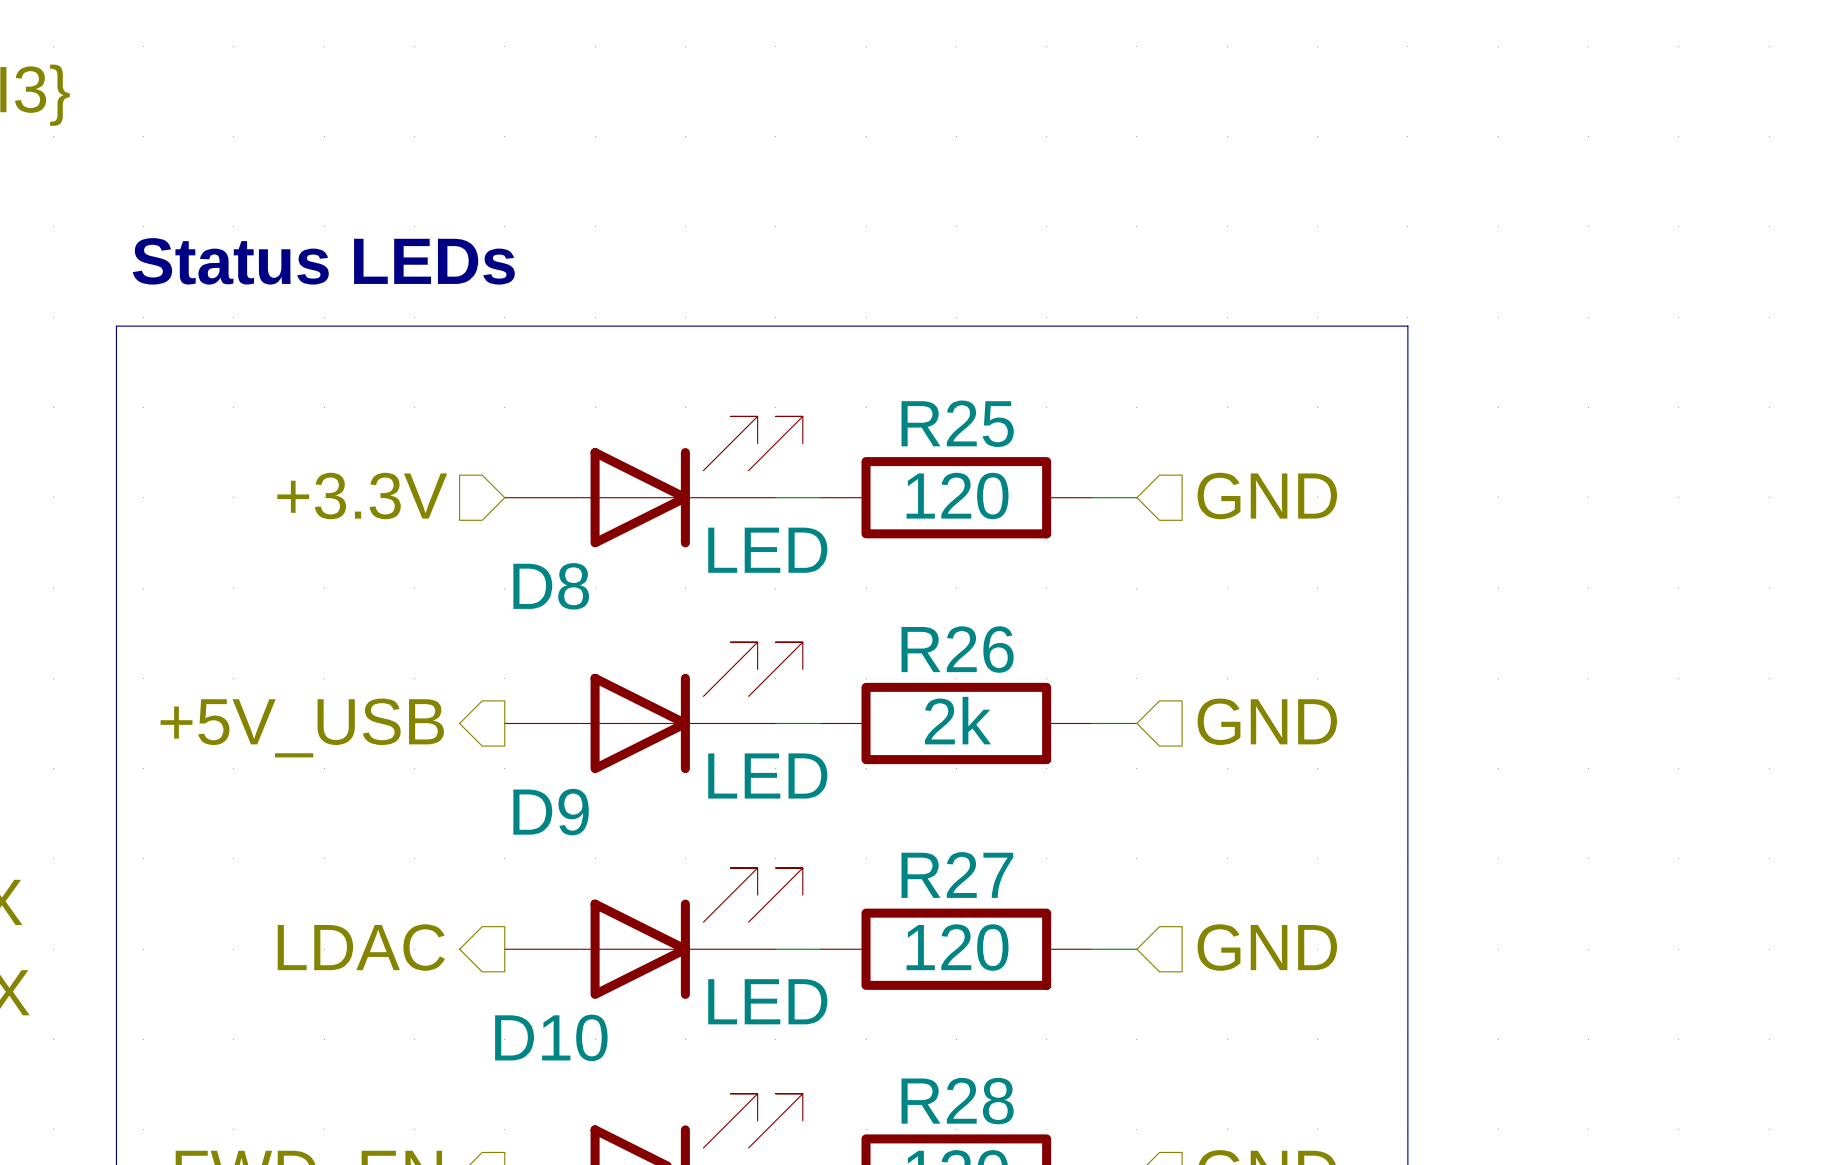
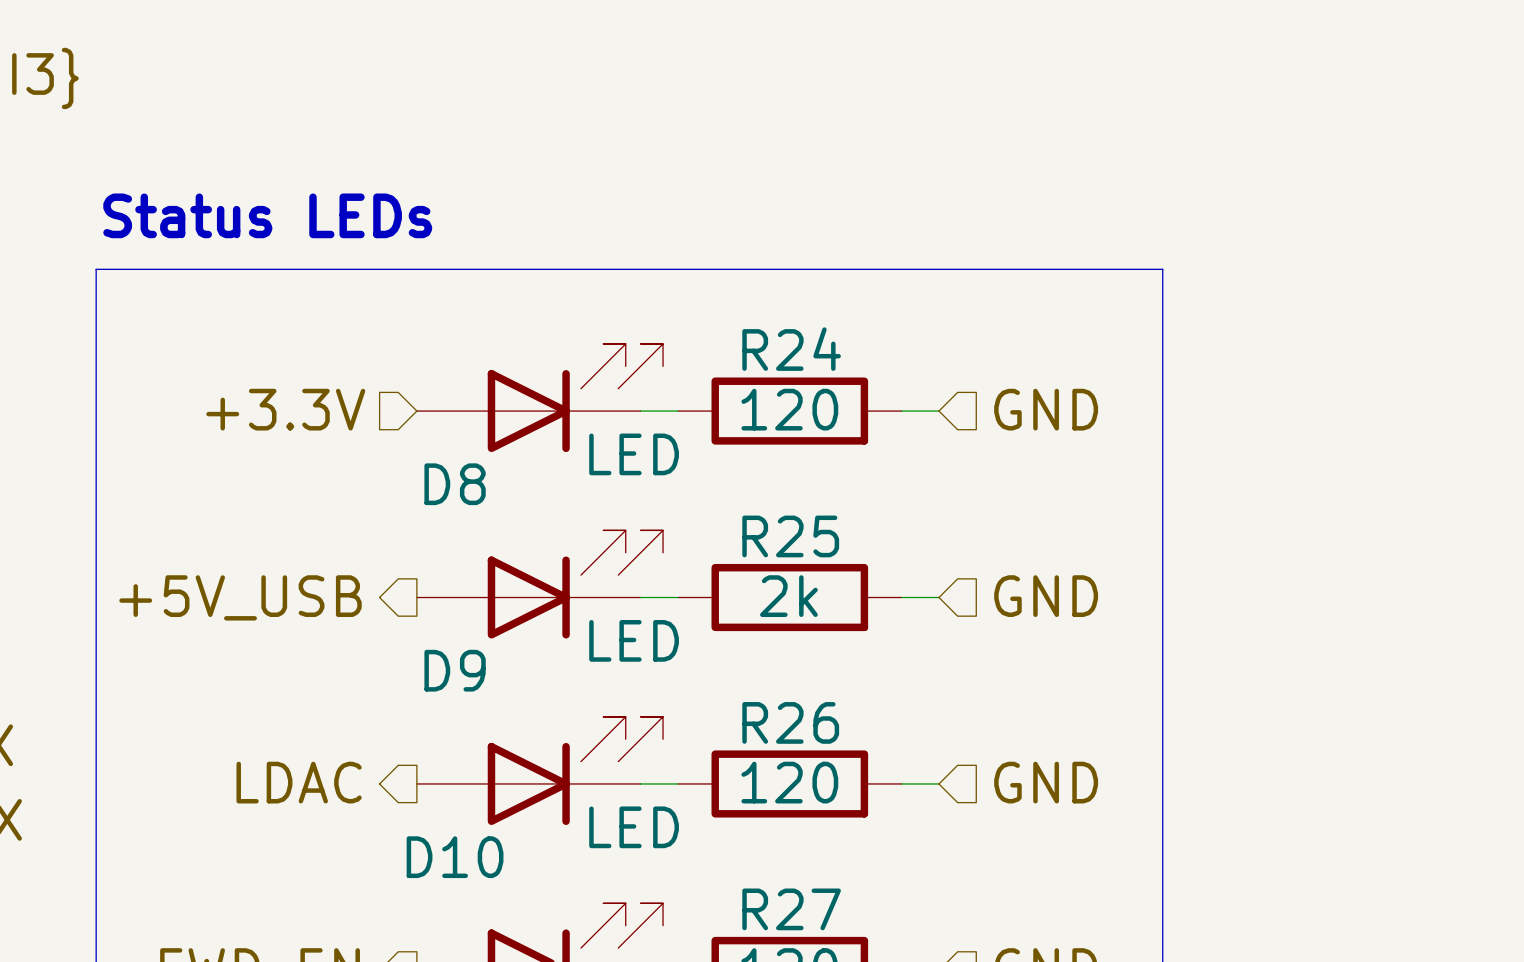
R25 name: R25 (957, 423) -> R24 (791, 349)
R26 name: R26 (957, 649) -> R25 (790, 536)
R27 name: R27 (957, 874) -> R26 (790, 722)
R28 name: R28 (957, 1101) -> R27 (791, 909)

